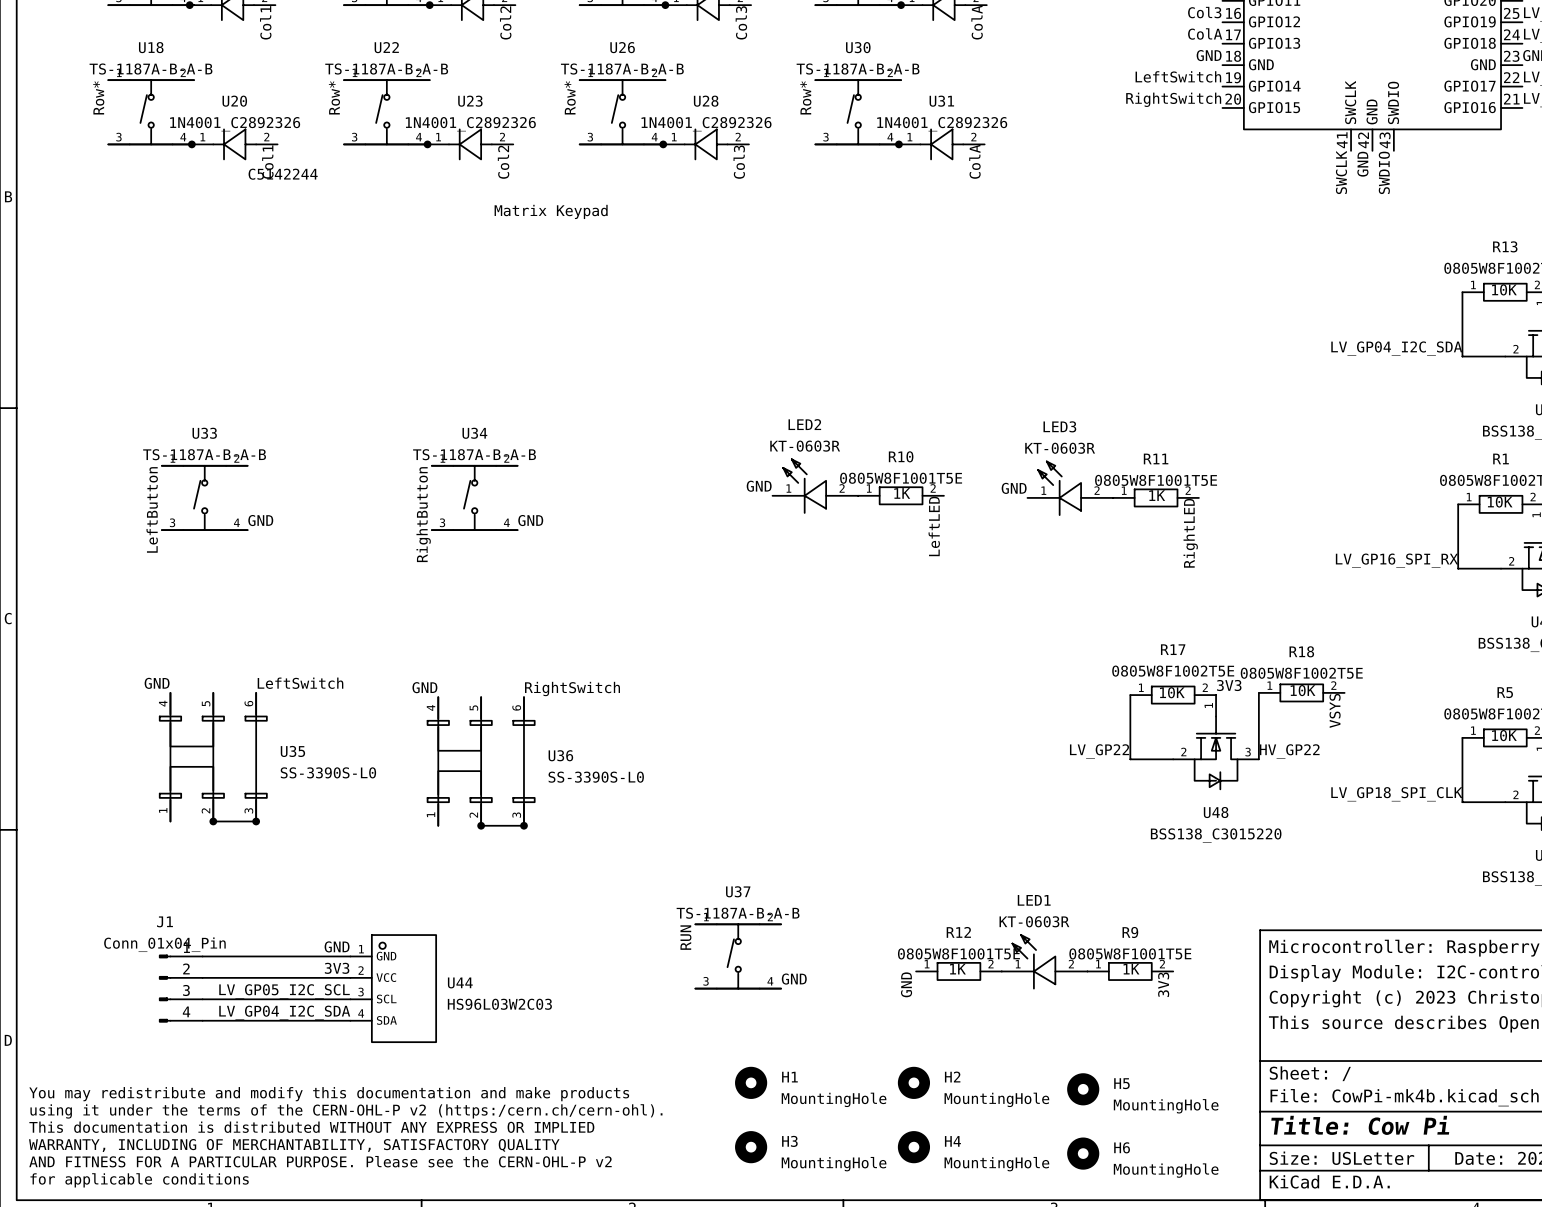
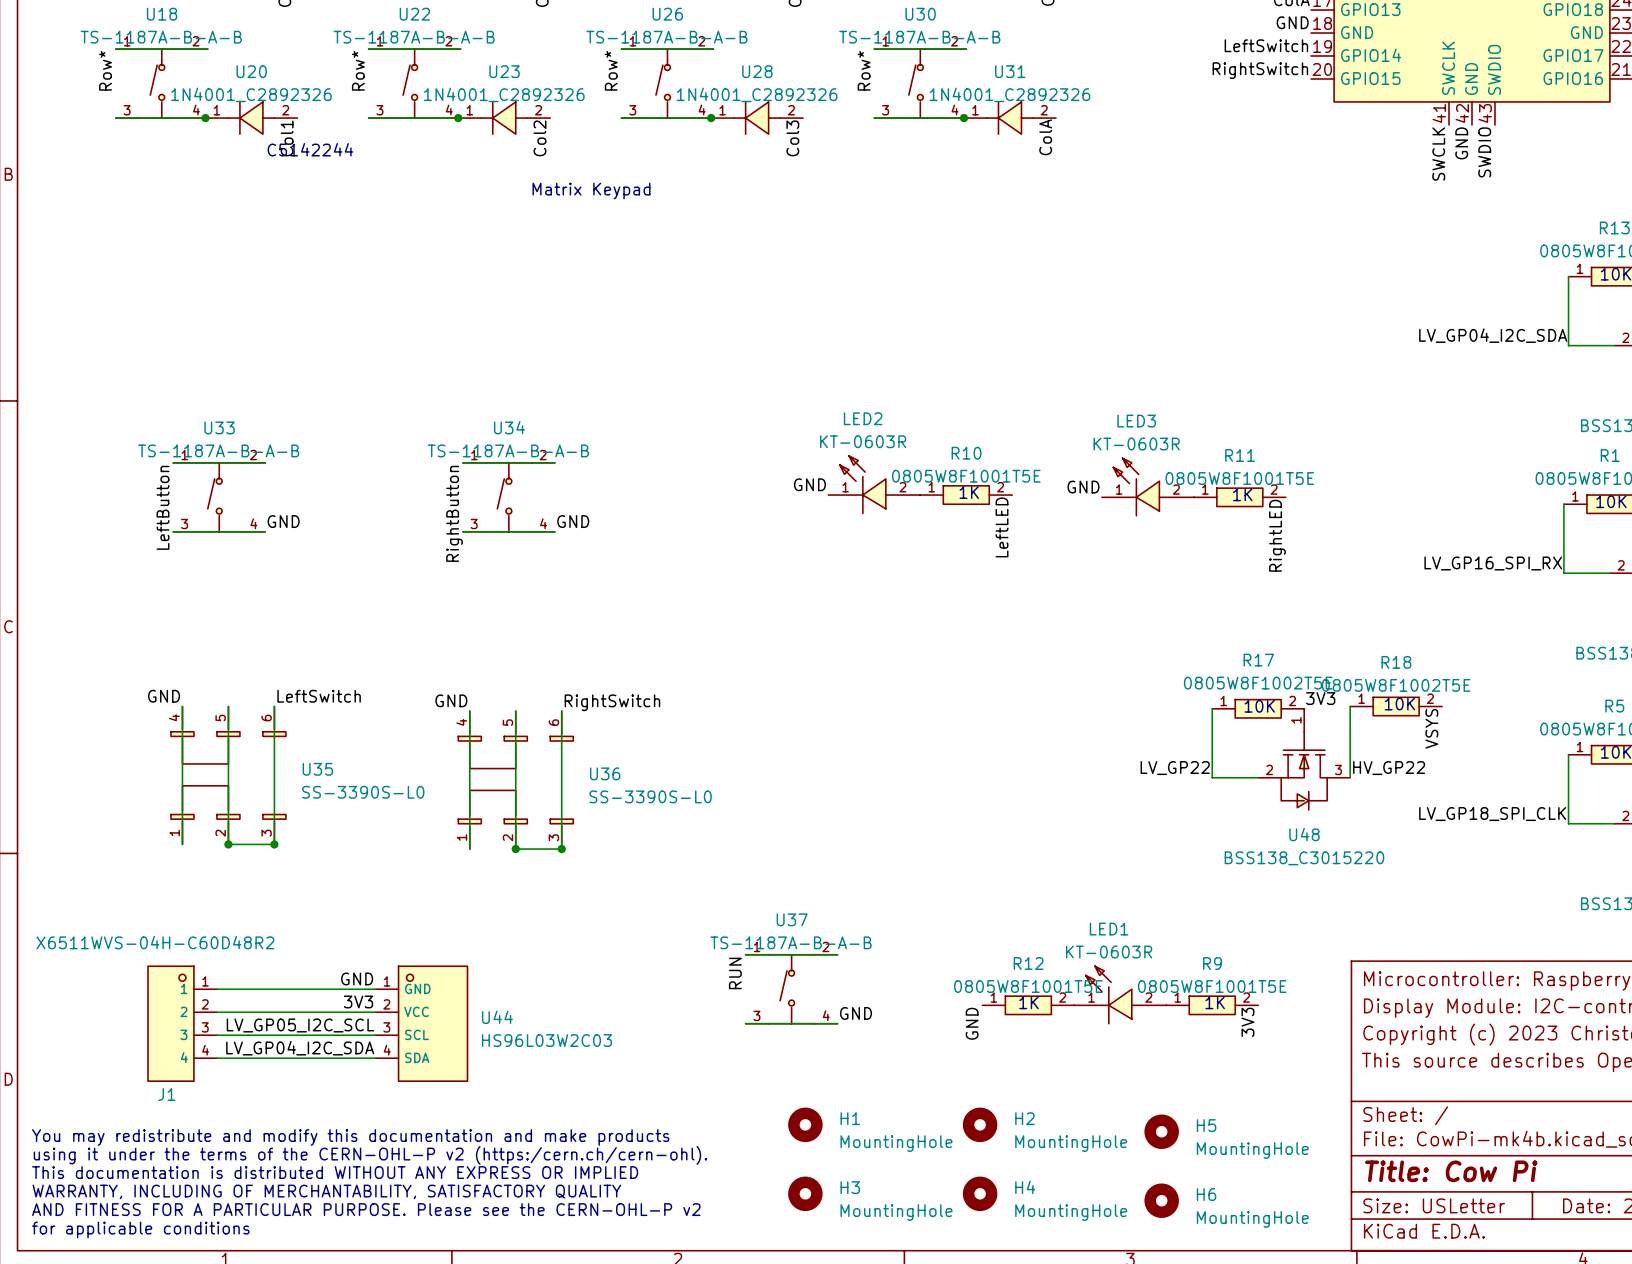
J1 name position: J1 (164, 921) -> J1 (166, 1094)
J1 value: Conn_01x04_Pin (164, 944) -> X6511WVS-04H-C60D48R2 (155, 942)
J1 symbol: [159, 954, 203, 1023] -> [147, 966, 217, 1082]

